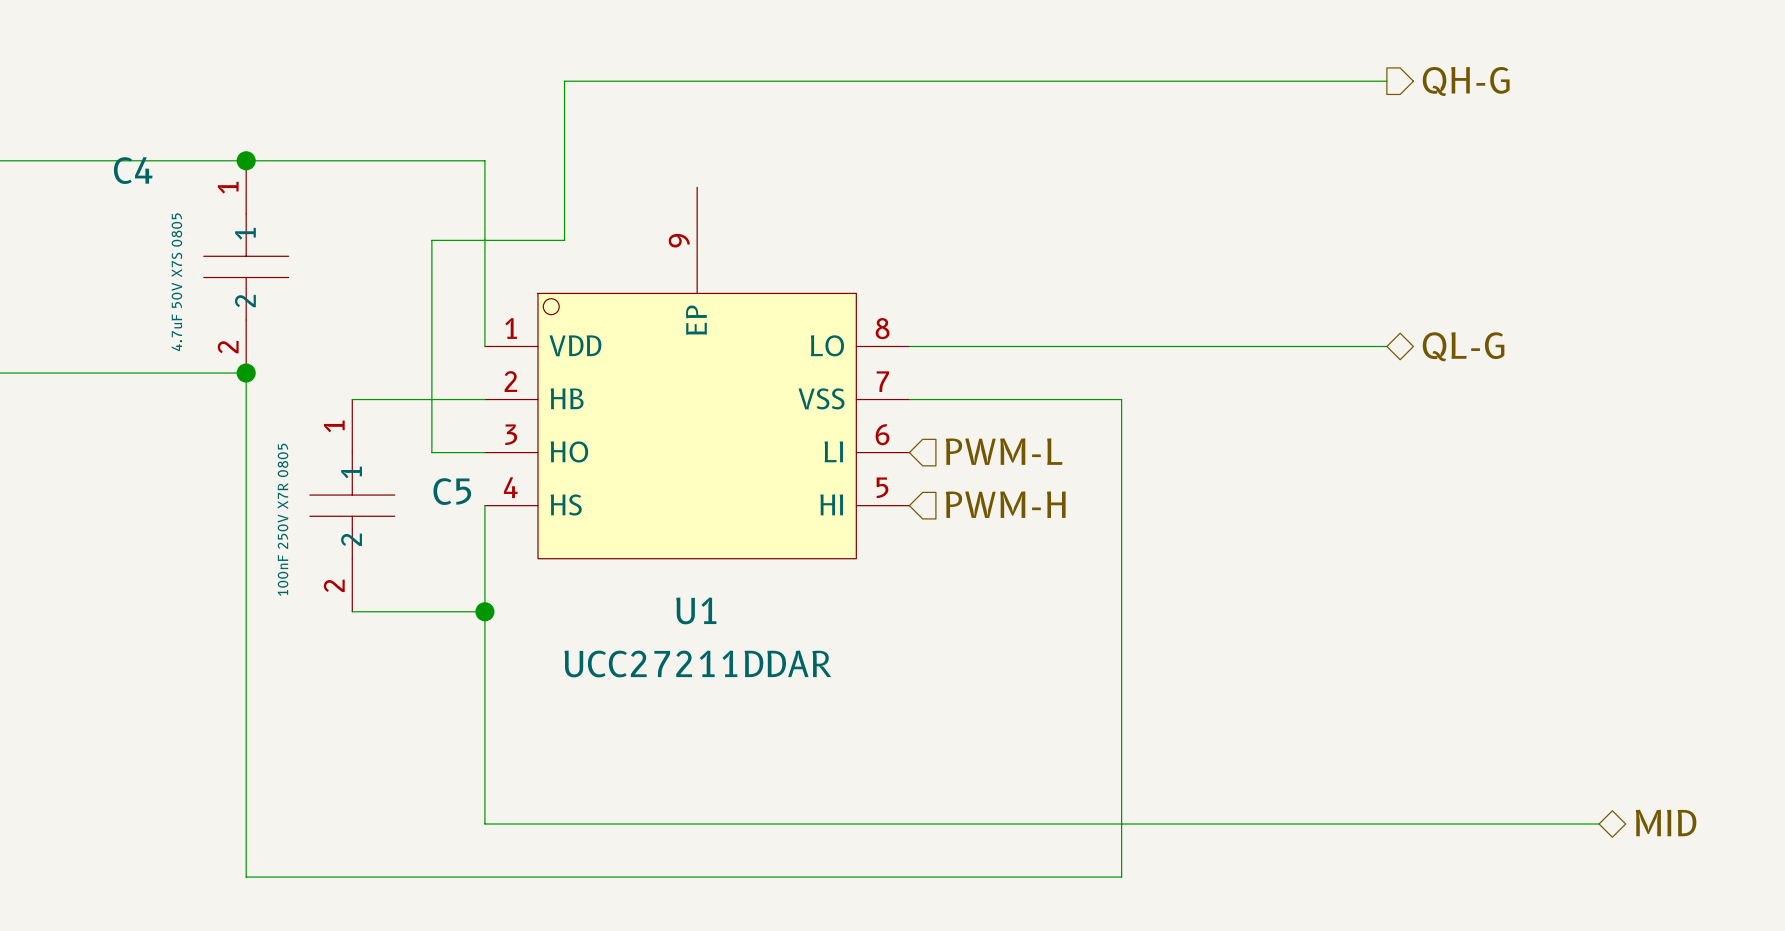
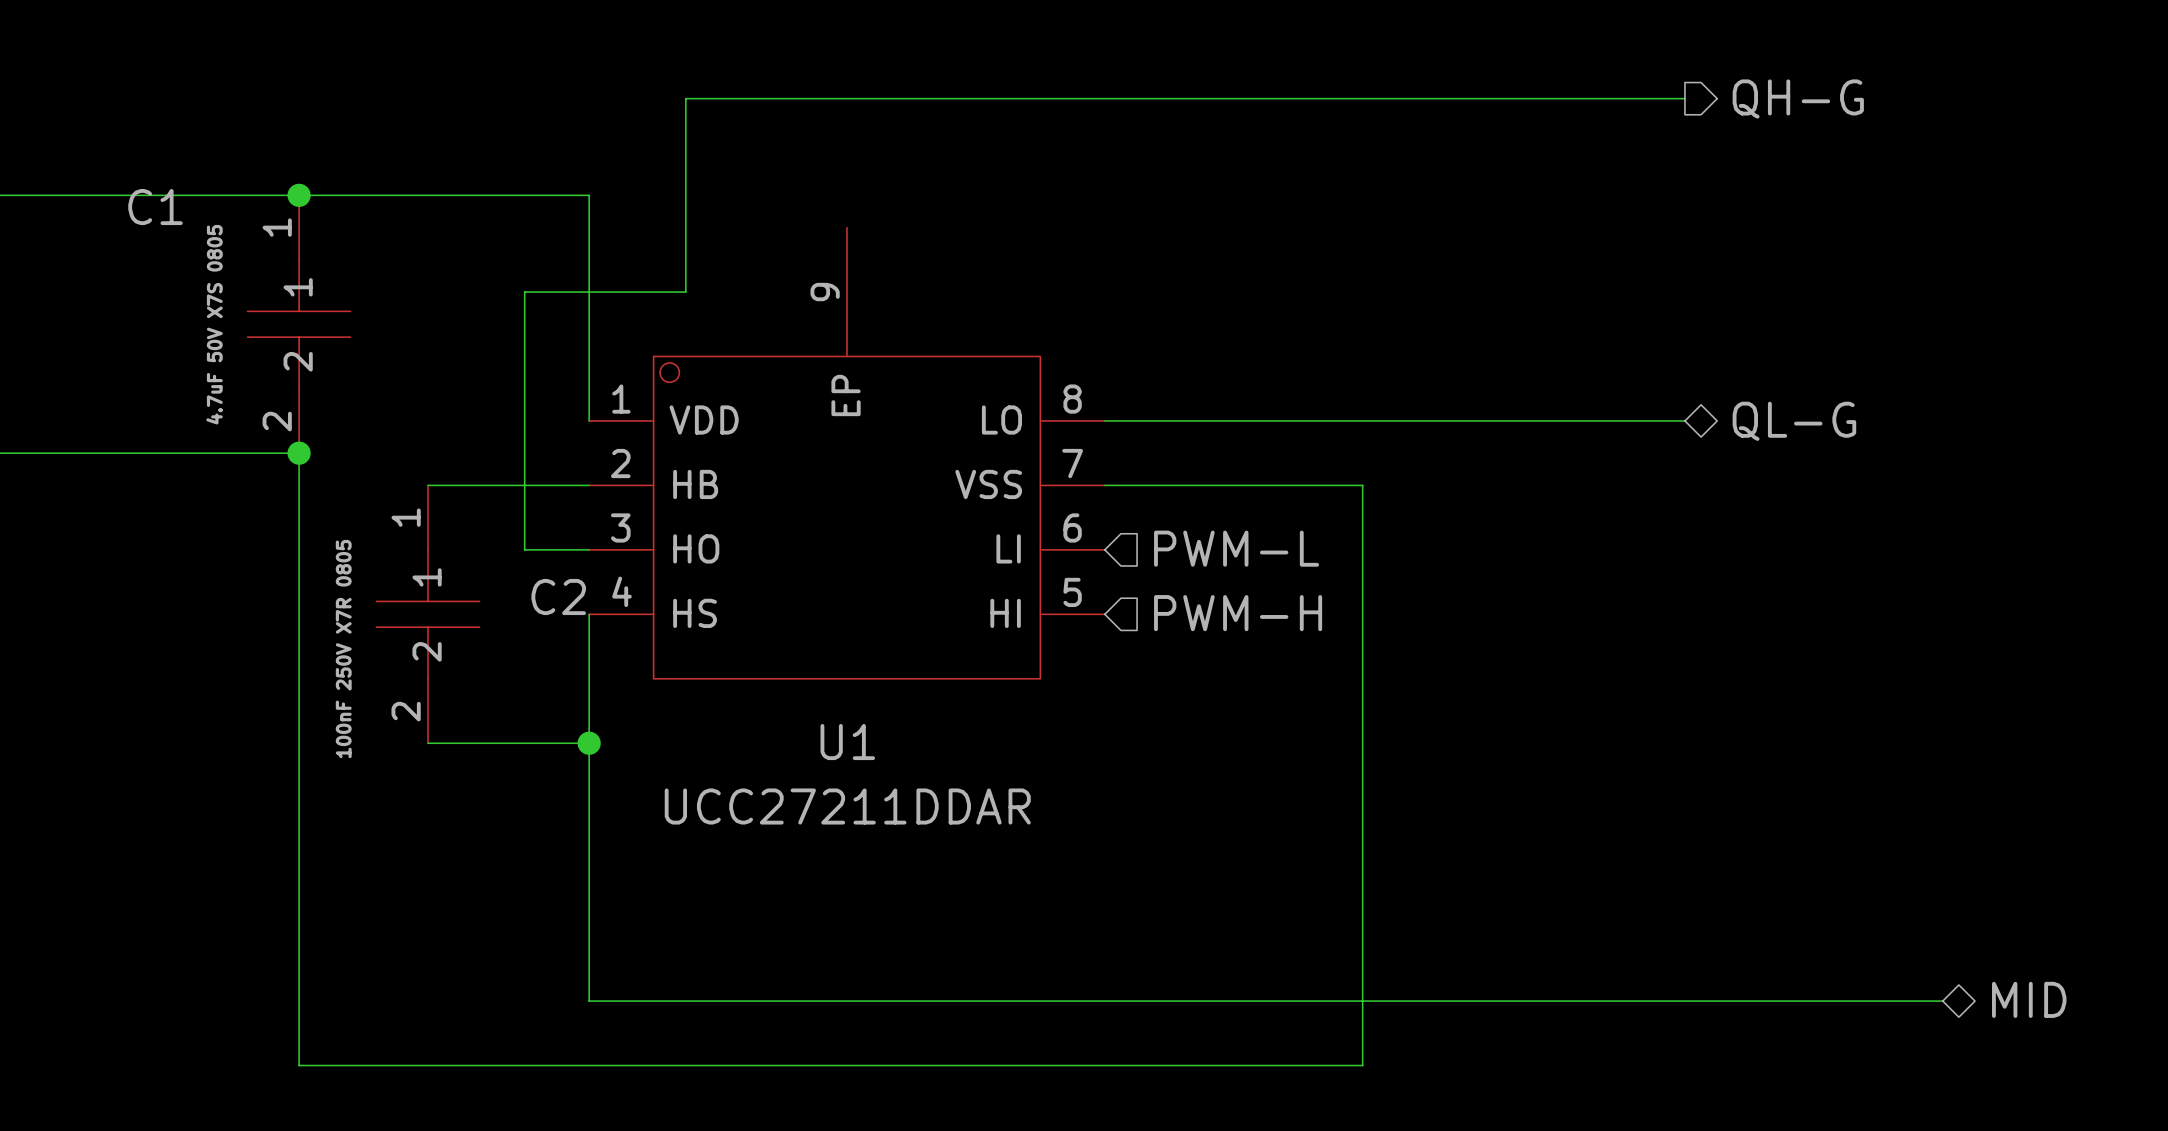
C4 name: C4 (133, 170) -> C1 (155, 207)
C5 name: C5 (452, 491) -> C2 (558, 597)

